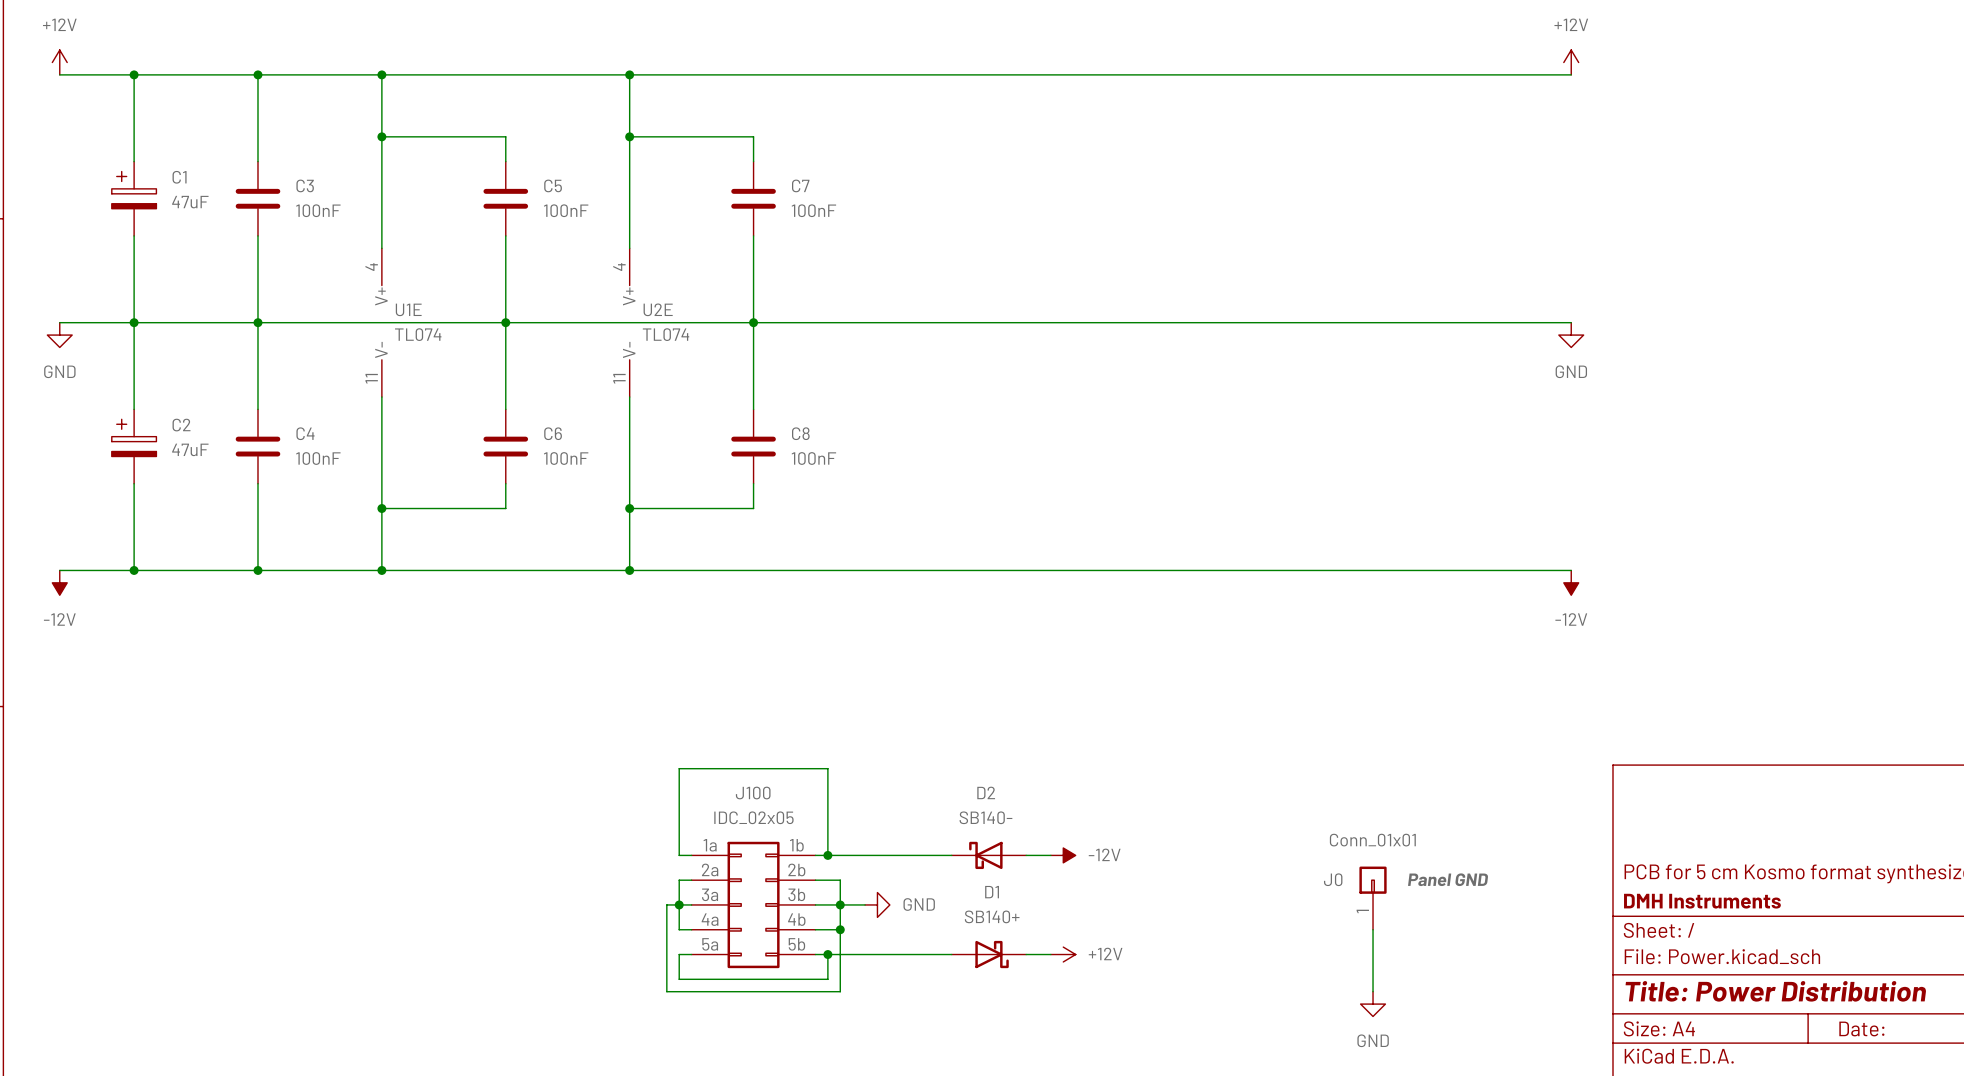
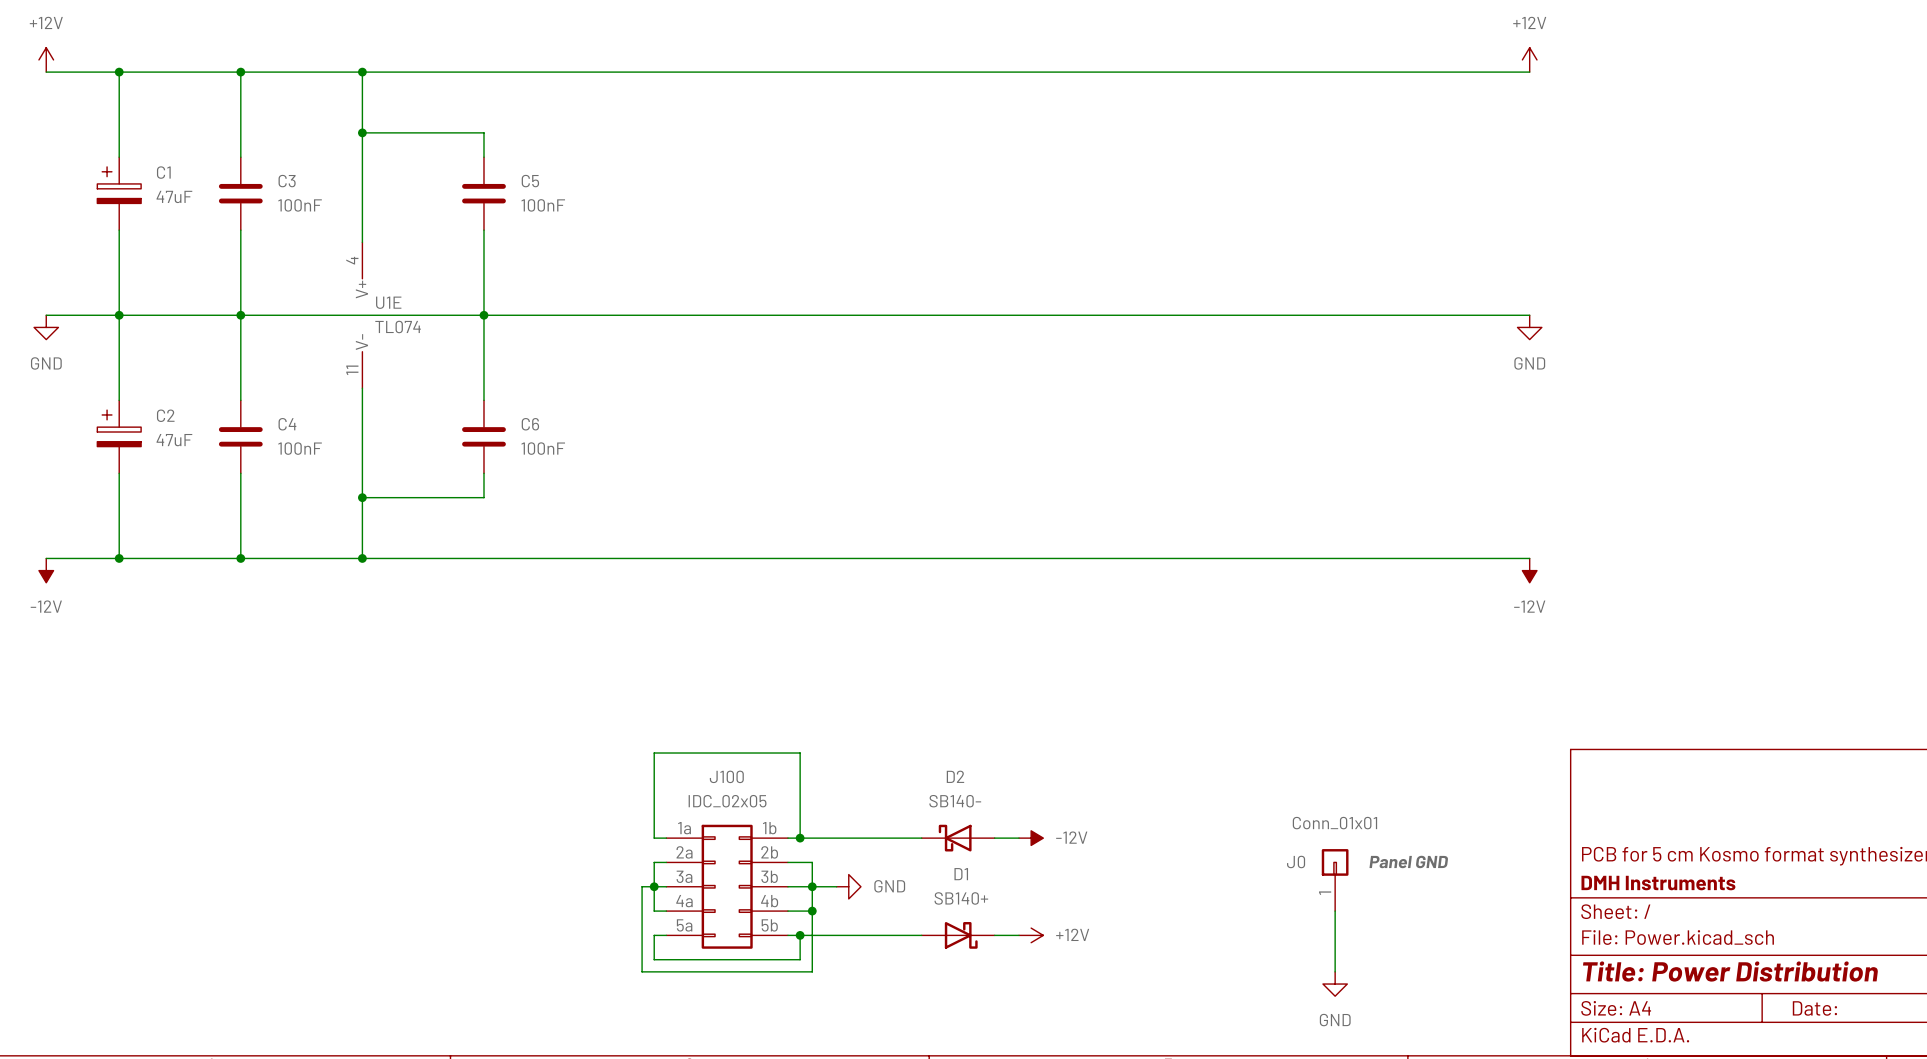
wire: (629, 74) (629, 248) -> none
junction: (629, 74) -> none
wire: (629, 136) (753, 136) (753, 161) -> none
junction: (629, 136) -> none
C7: 100nF (753, 198) -> none
wire: (753, 235) (753, 409) -> none
U2E: TL074 (629, 322) -> none
junction: (753, 322) -> none
wire: (629, 397) (629, 570) -> none
C8: 100nF (753, 446) -> none
wire: (753, 483) (753, 508) (629, 508) -> none
junction: (629, 508) -> none
junction: (629, 570) -> none

